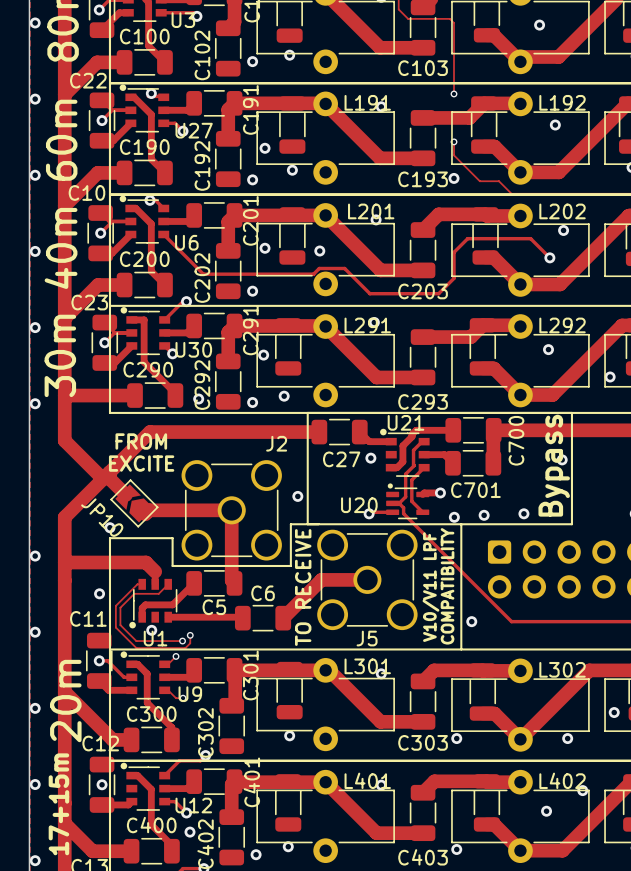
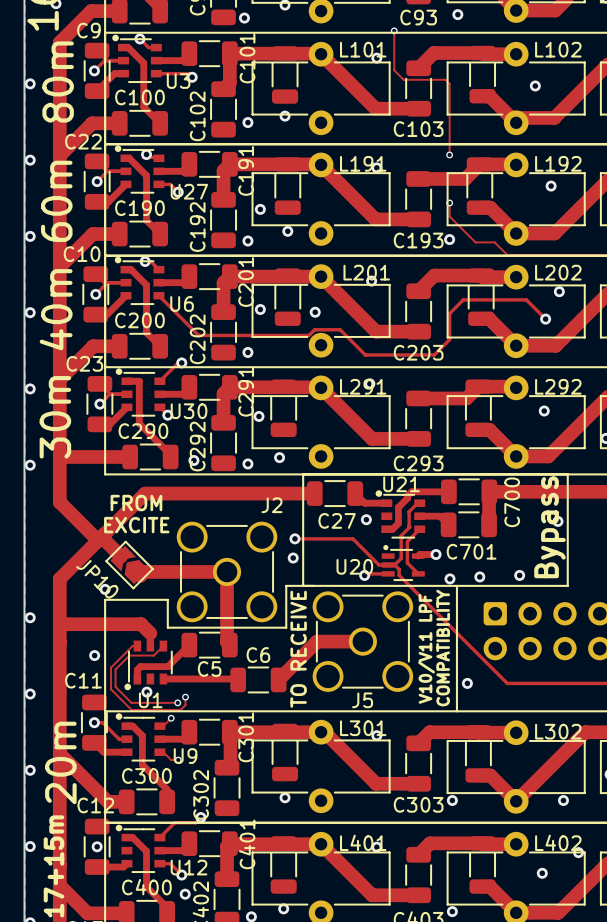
track: none -> (294, 538) (352, 538) (379, 564) (388, 564)
via: none -> (294, 538)

